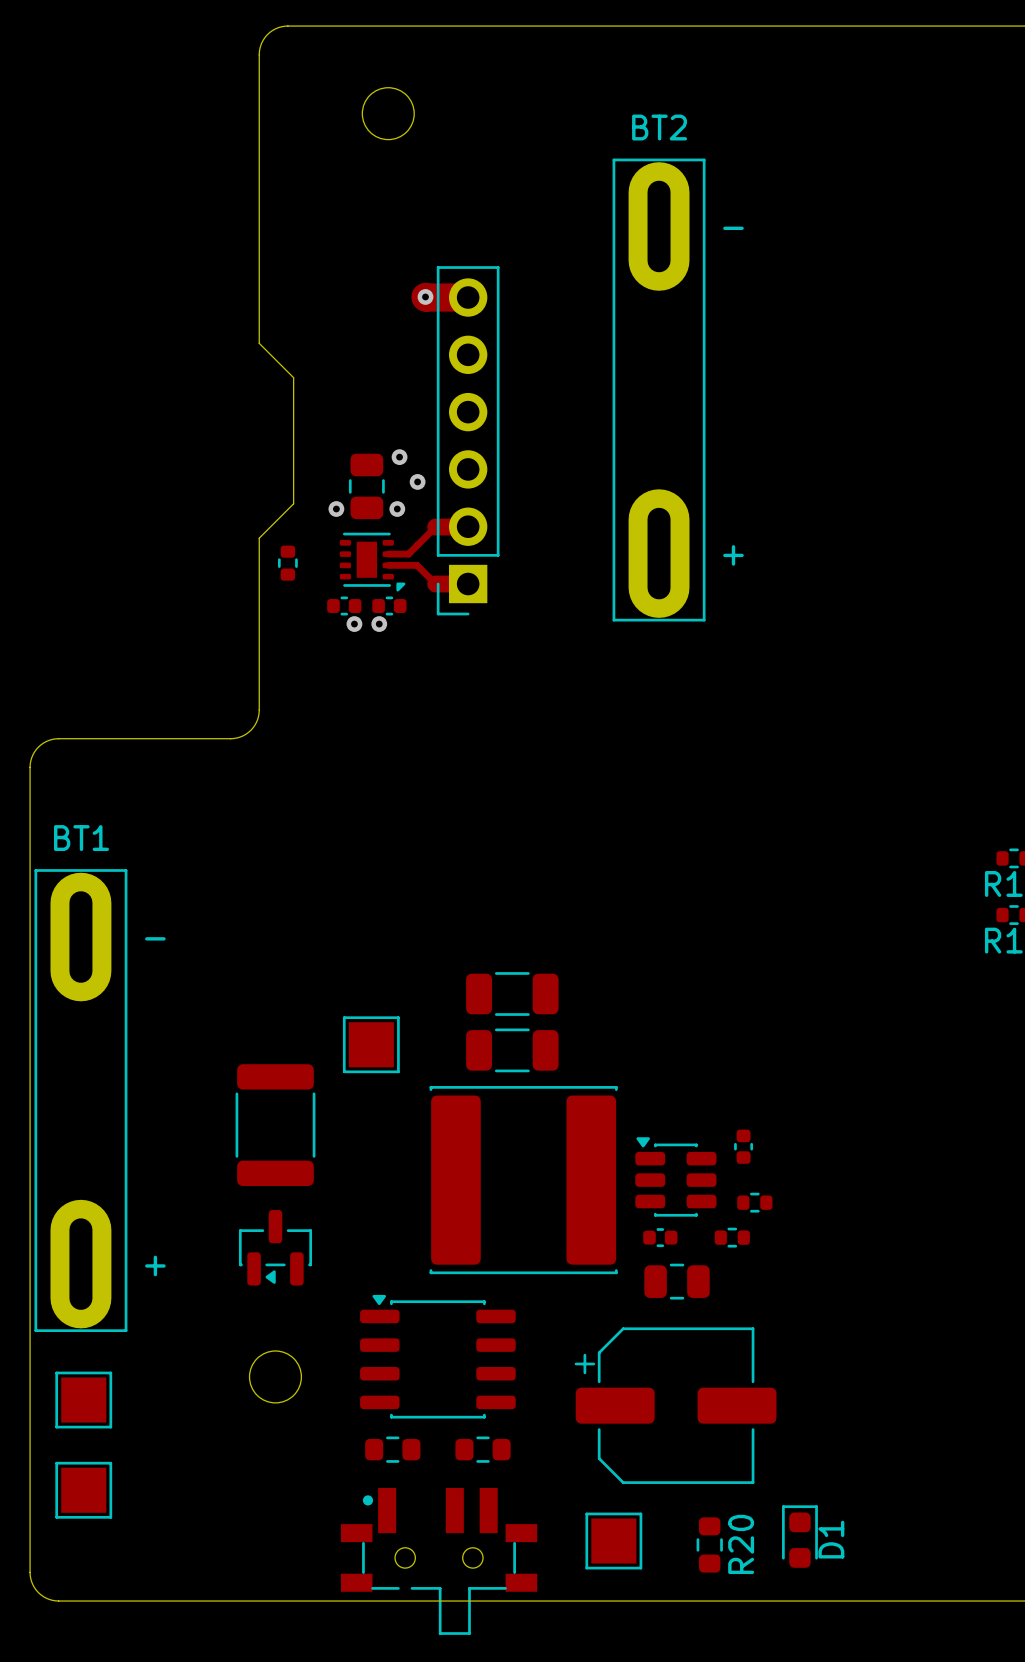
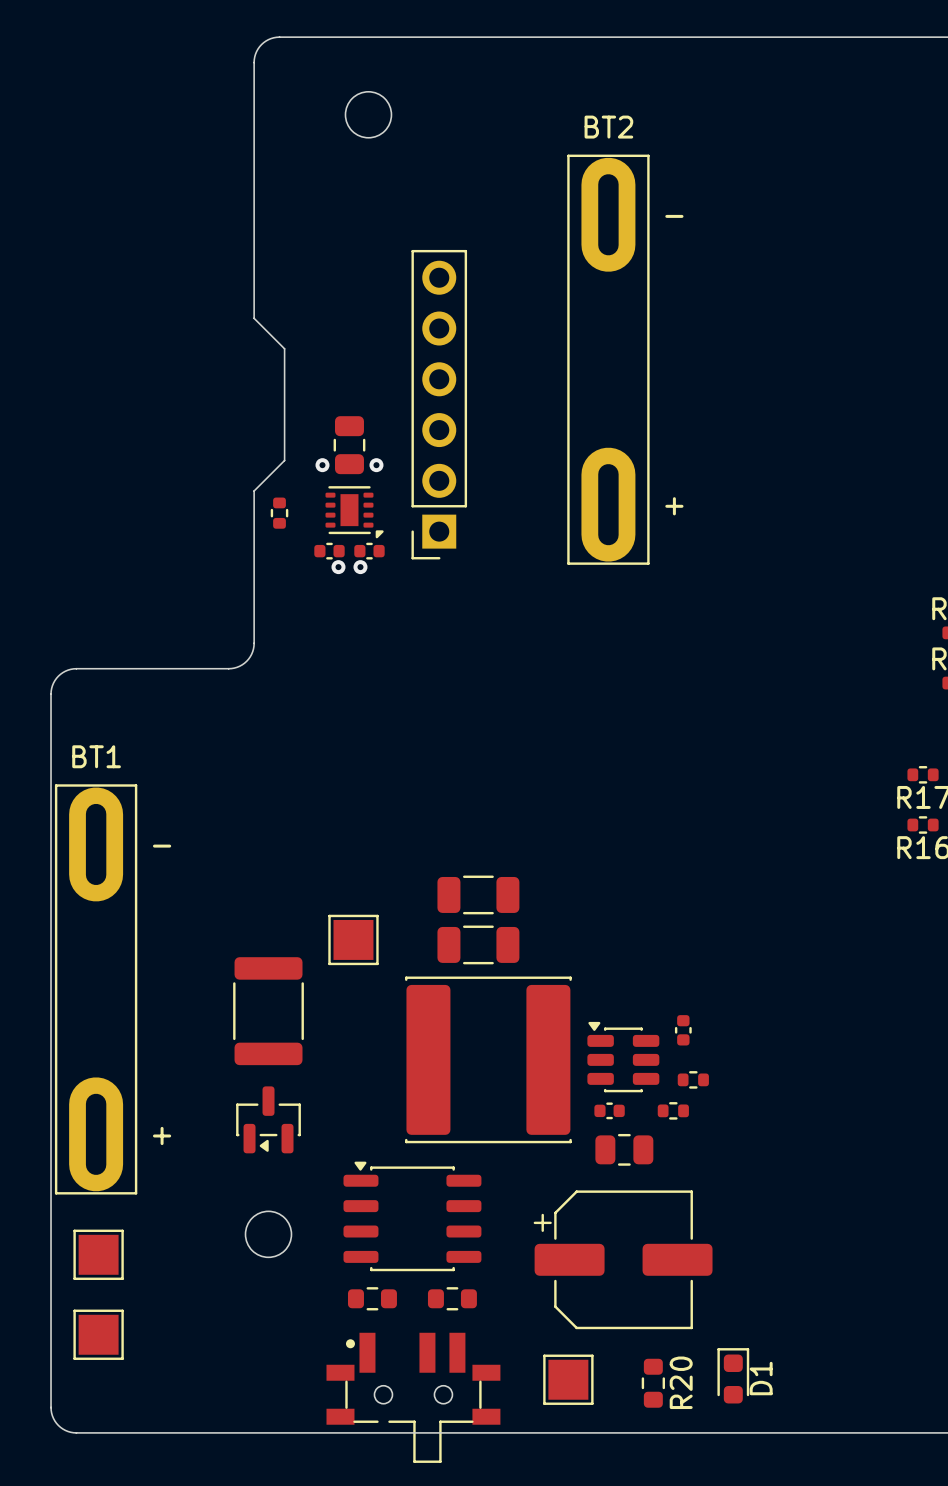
track: (425, 296) (468, 297) -> none
via: (425, 296) -> none
via: (399, 457) -> none
via: (417, 481) -> none
track: (468, 526) (435, 527) (408, 554) (388, 554) -> none
track: (388, 565) (417, 565) (435, 584) (468, 584) -> none

